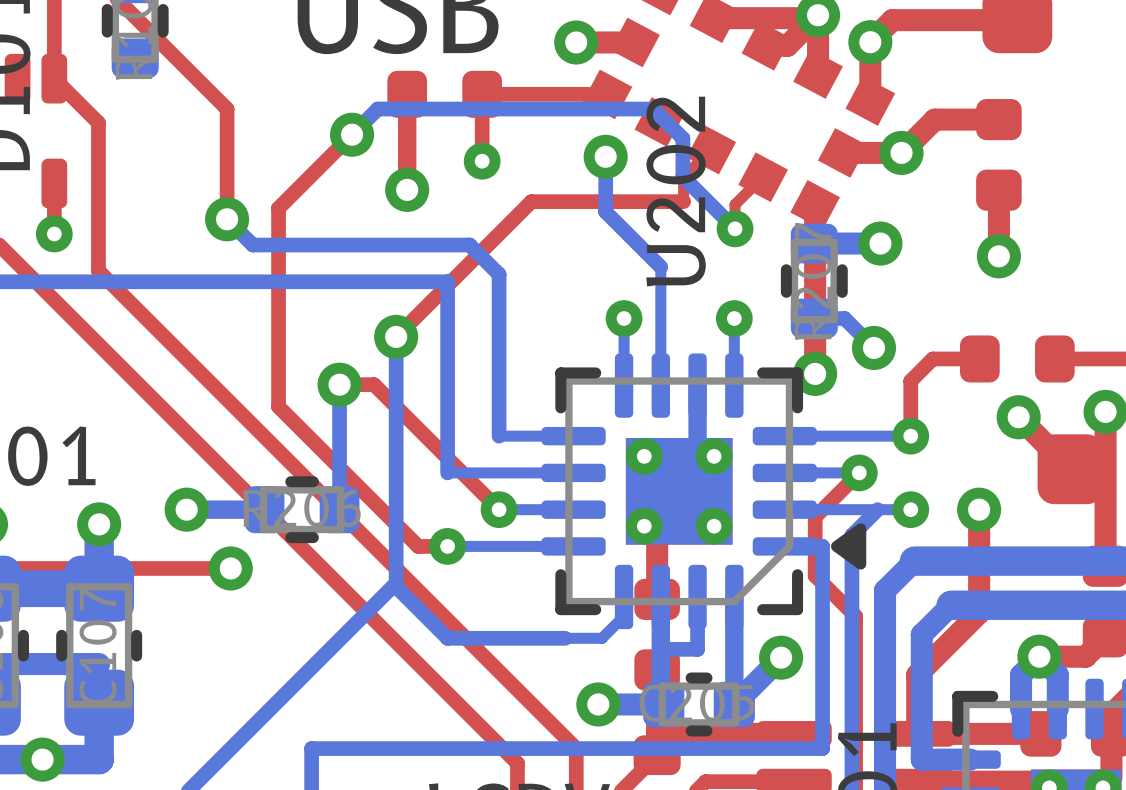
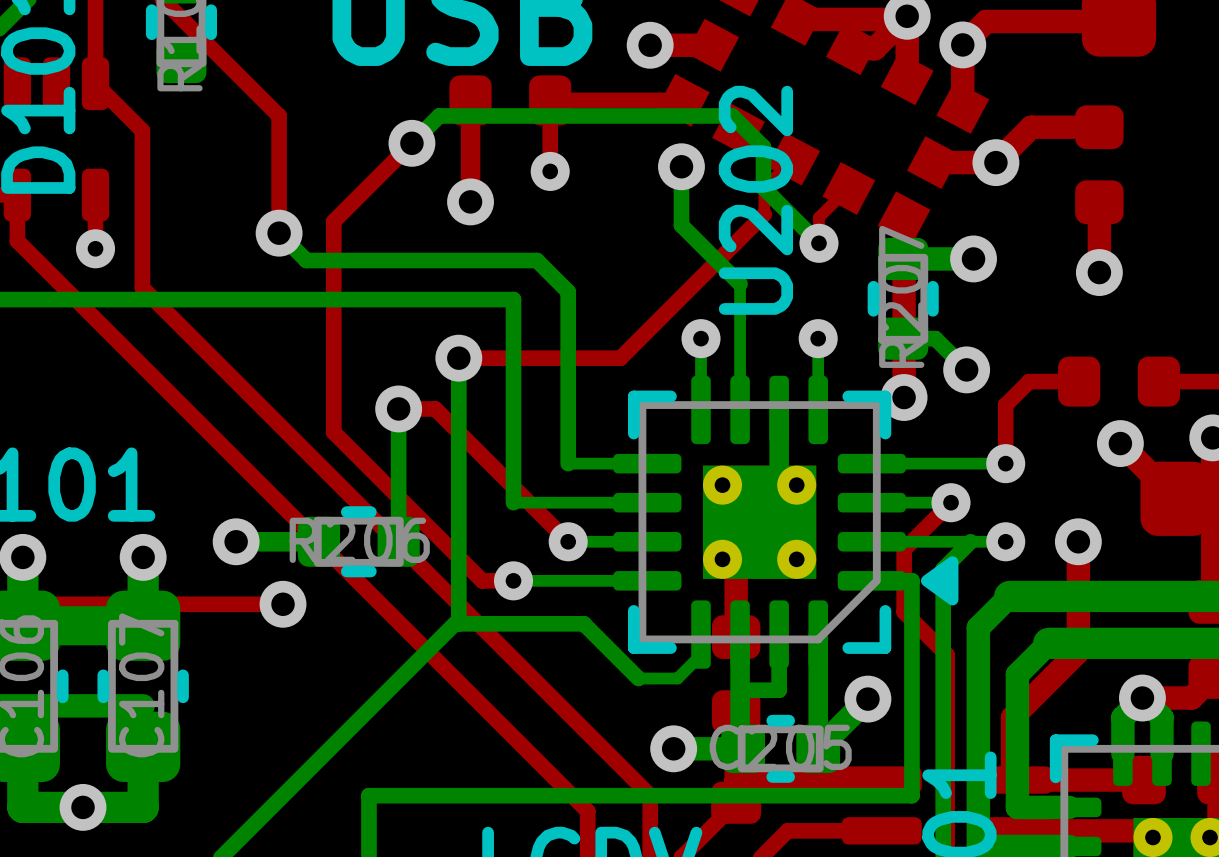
top track: (683, 201) (531, 201) (396, 336) -> (764, 214) (620, 358) (458, 358)
bottom track: (396, 586) (447, 638) (565, 638) -> (458, 623) (583, 623) (638, 678)

